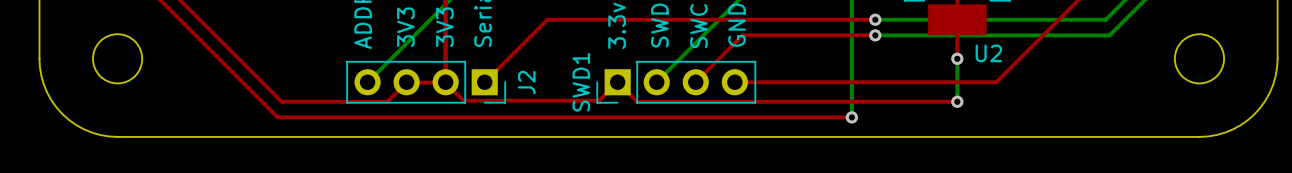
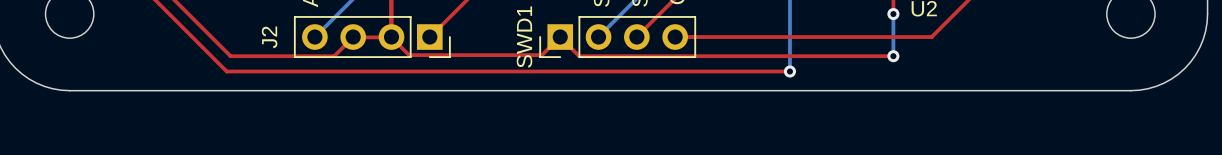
J2 name position: J2 (526, 82) -> J2 (269, 37)

